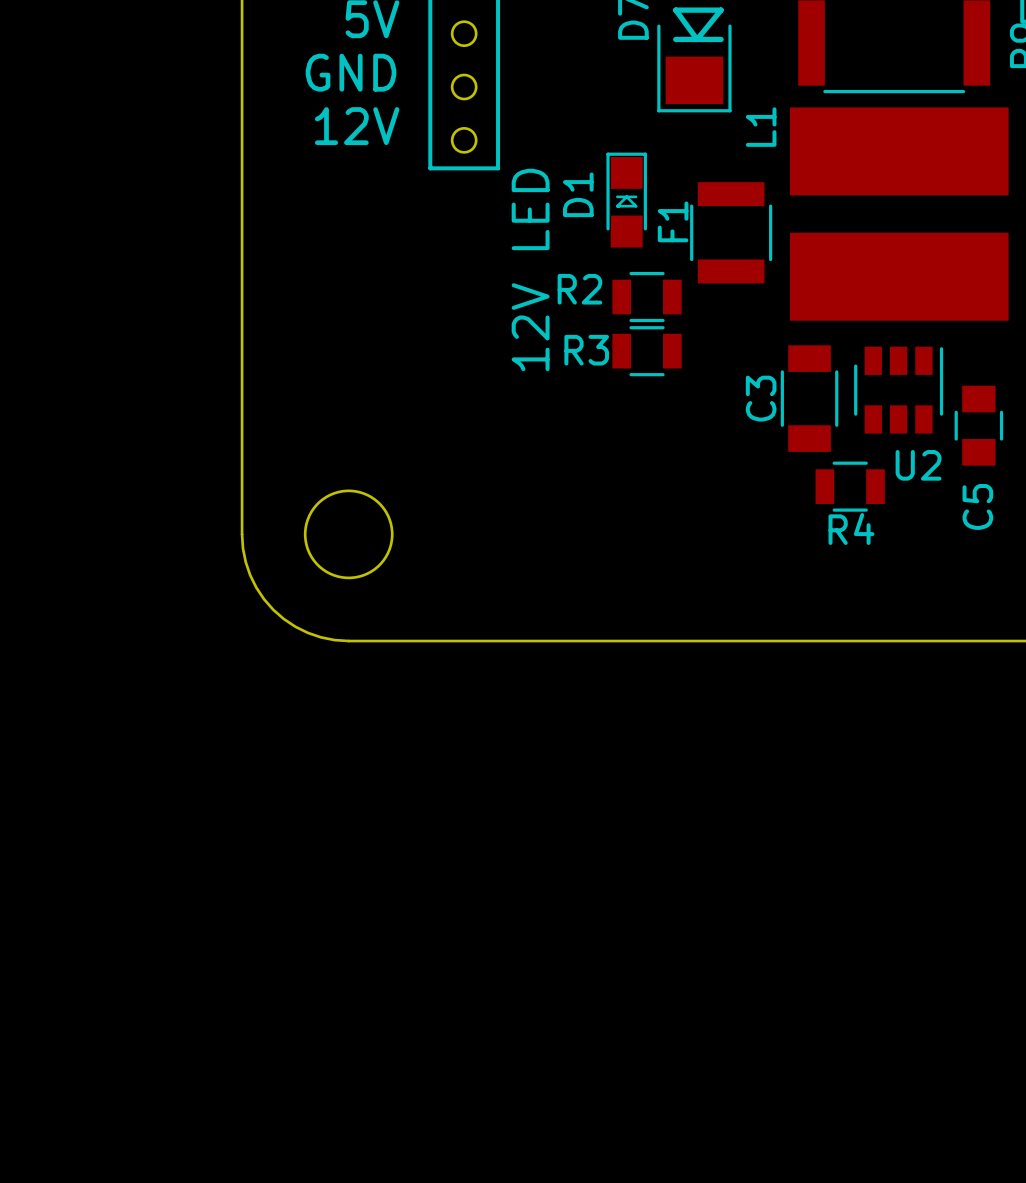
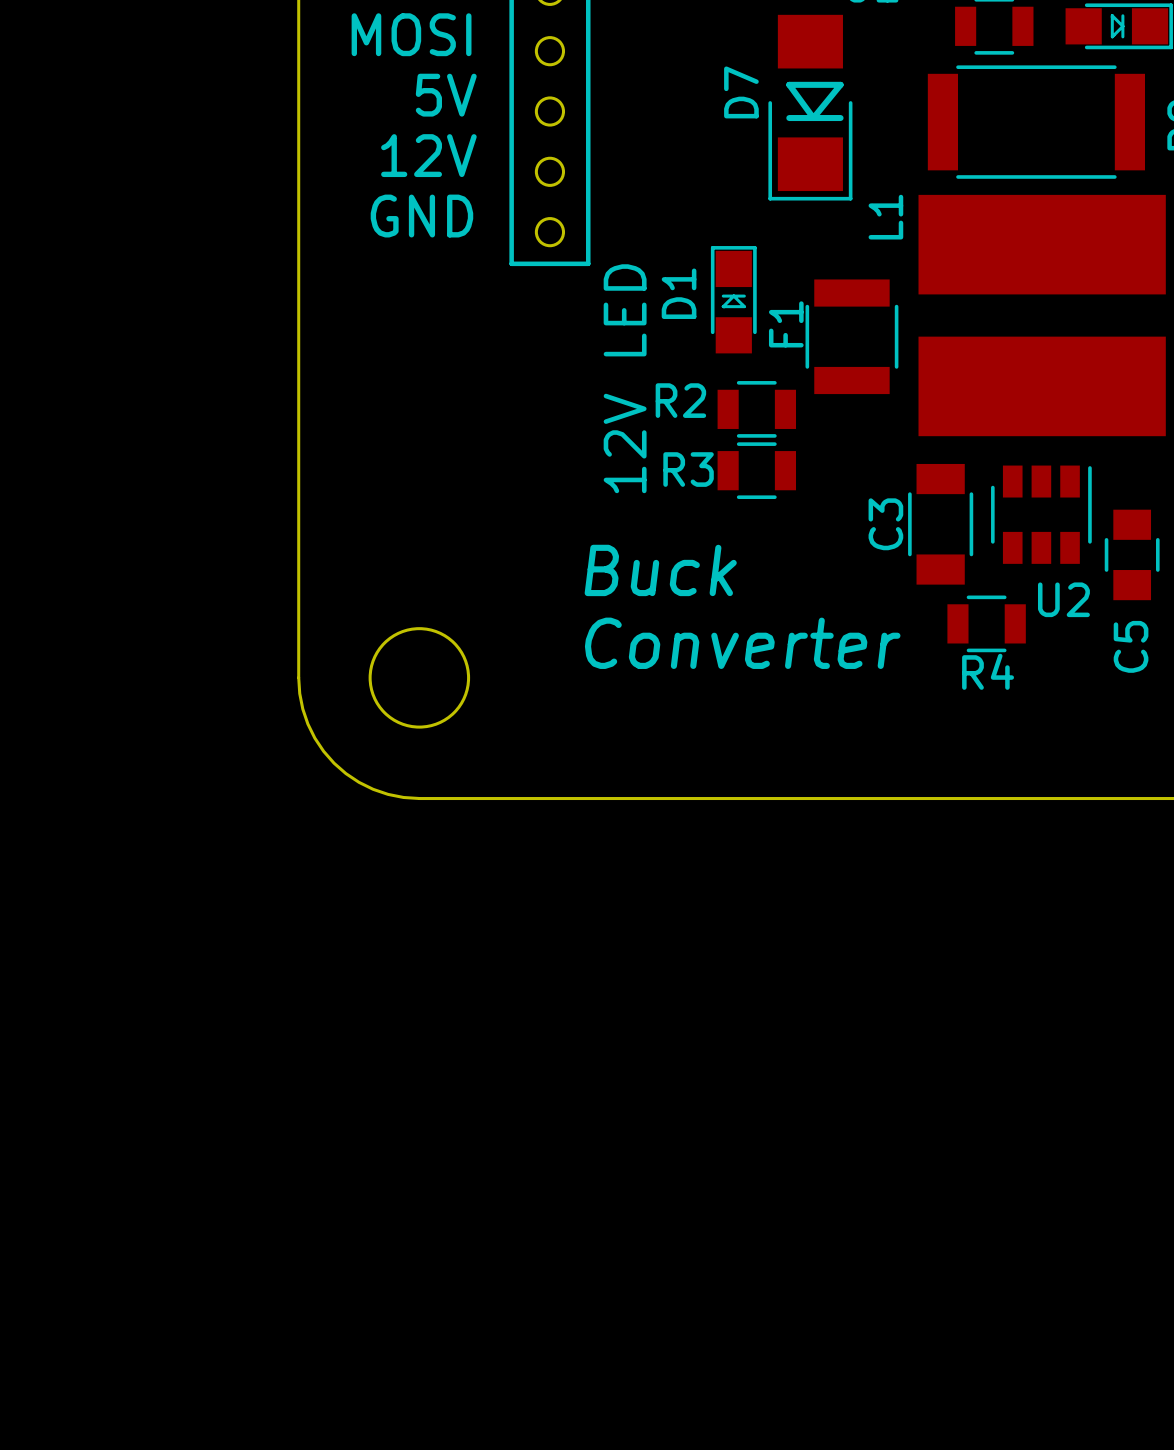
text: GND (351, 72) -> 12V (428, 155)
text: 12V (357, 126) -> GND (421, 216)
text: none -> Buck (660, 570)
text: none -> Converter (742, 643)

